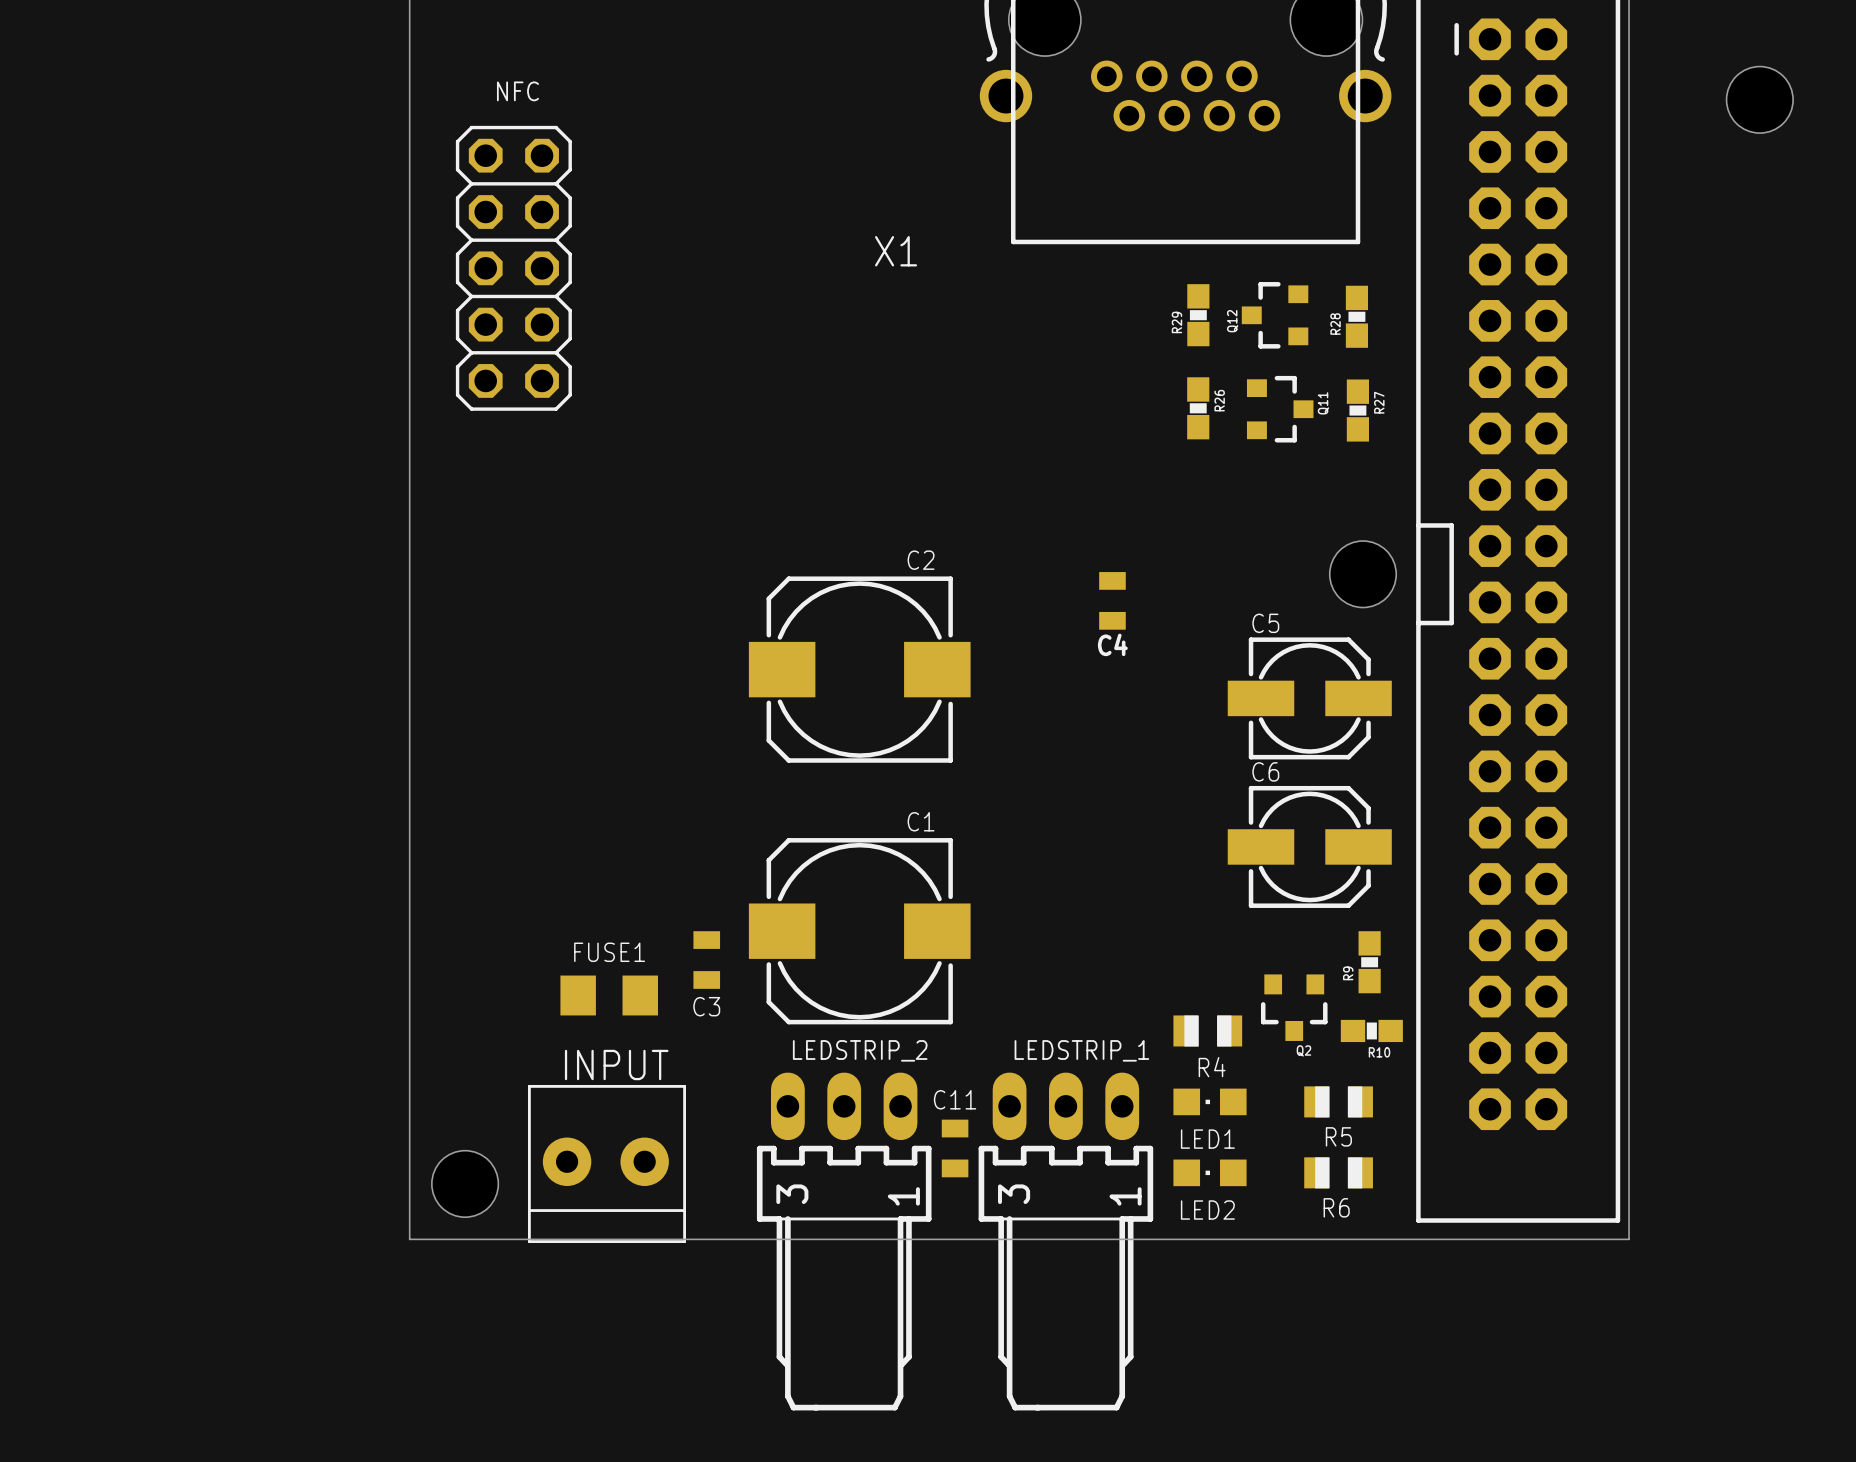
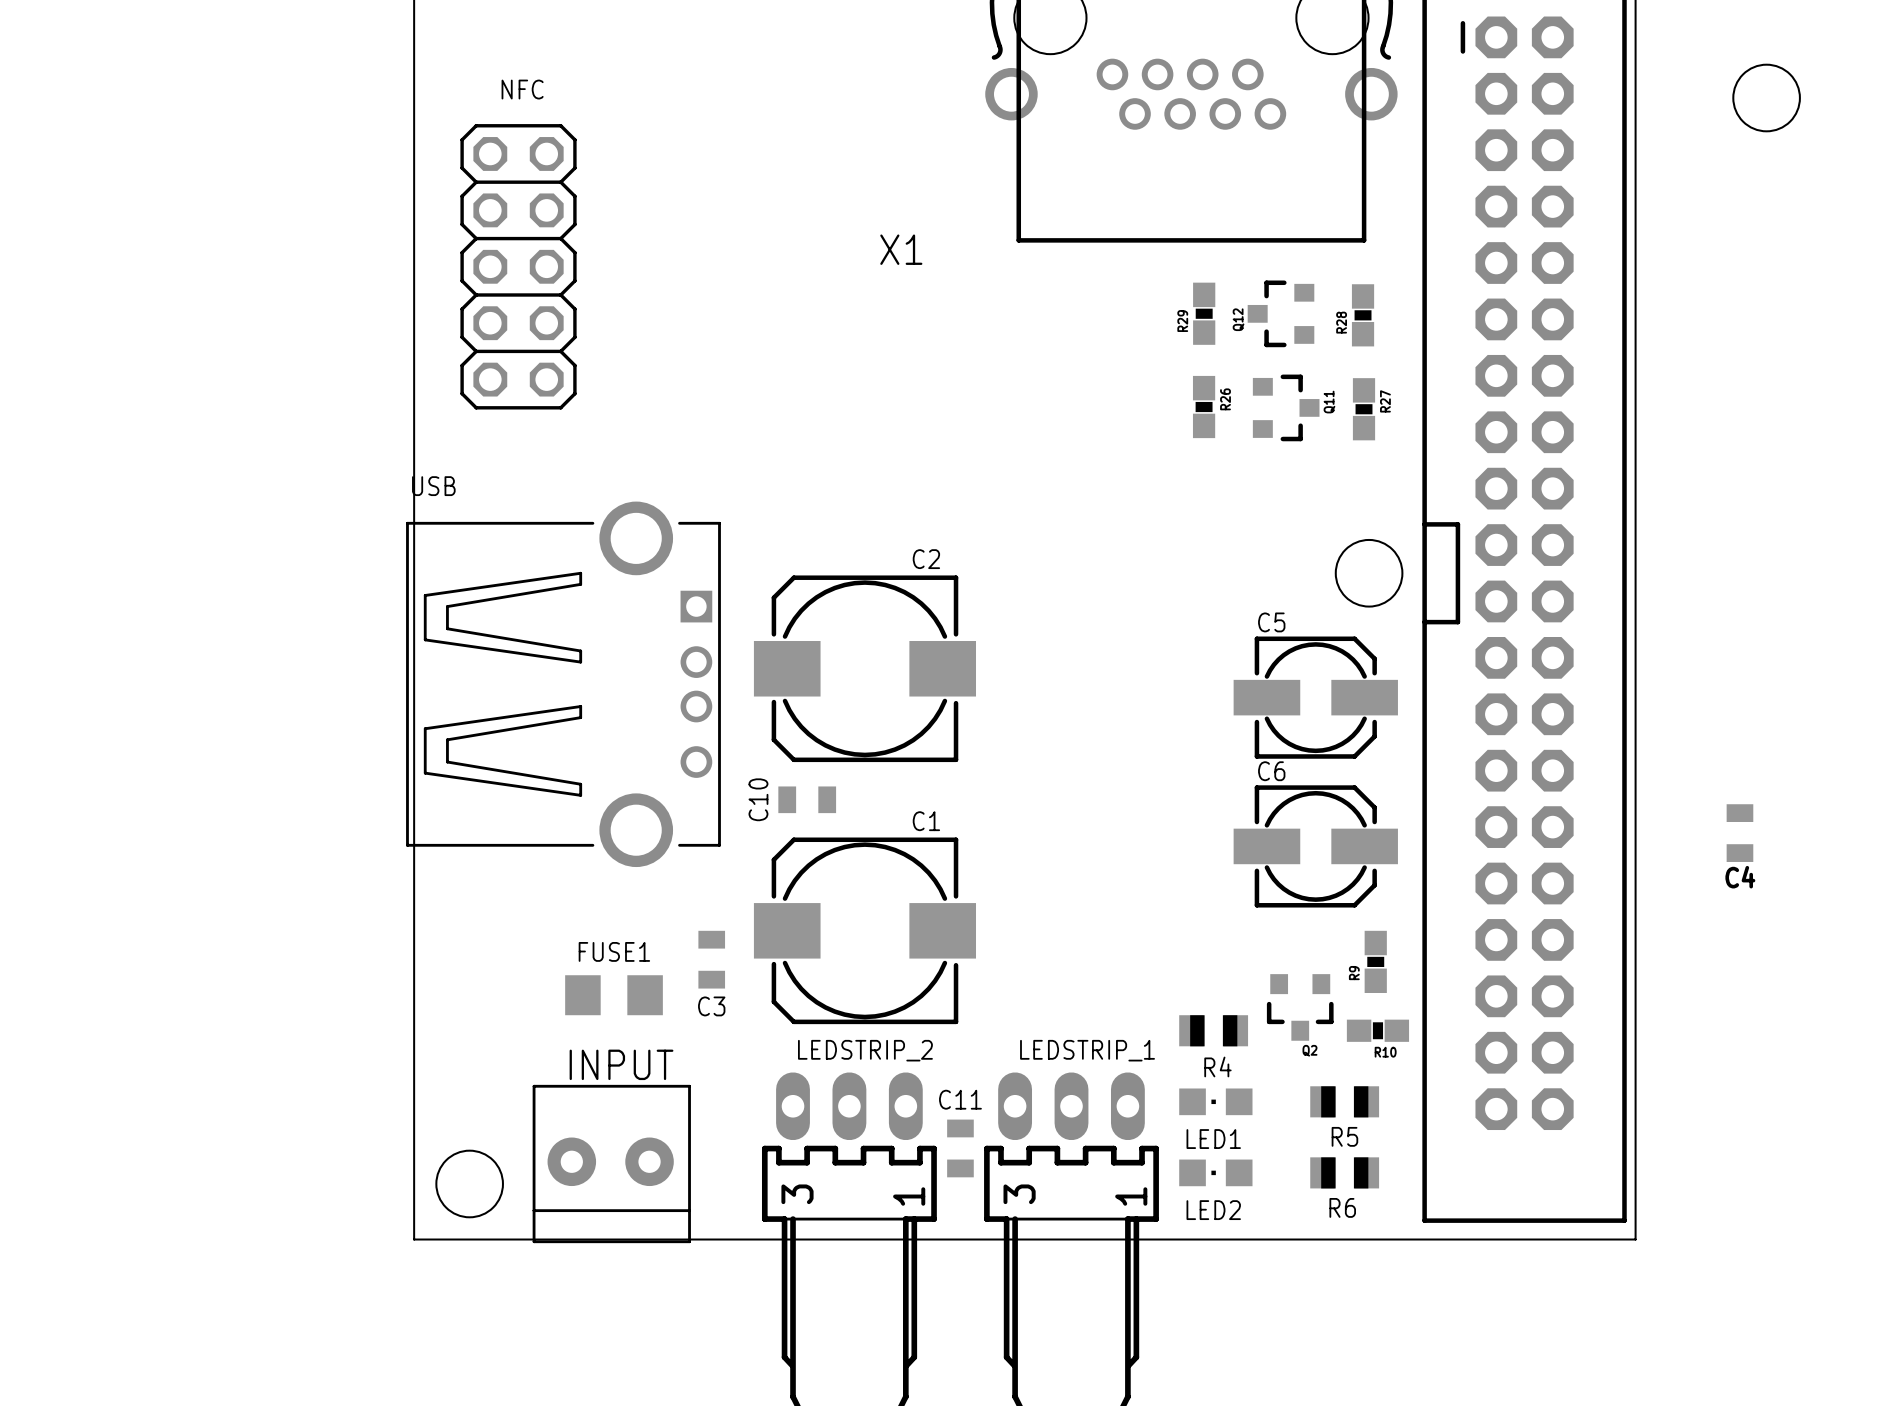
C4 position: (1112, 600) -> (1739, 833)
USB: none -> (563, 684)
C10: none -> (807, 799)

